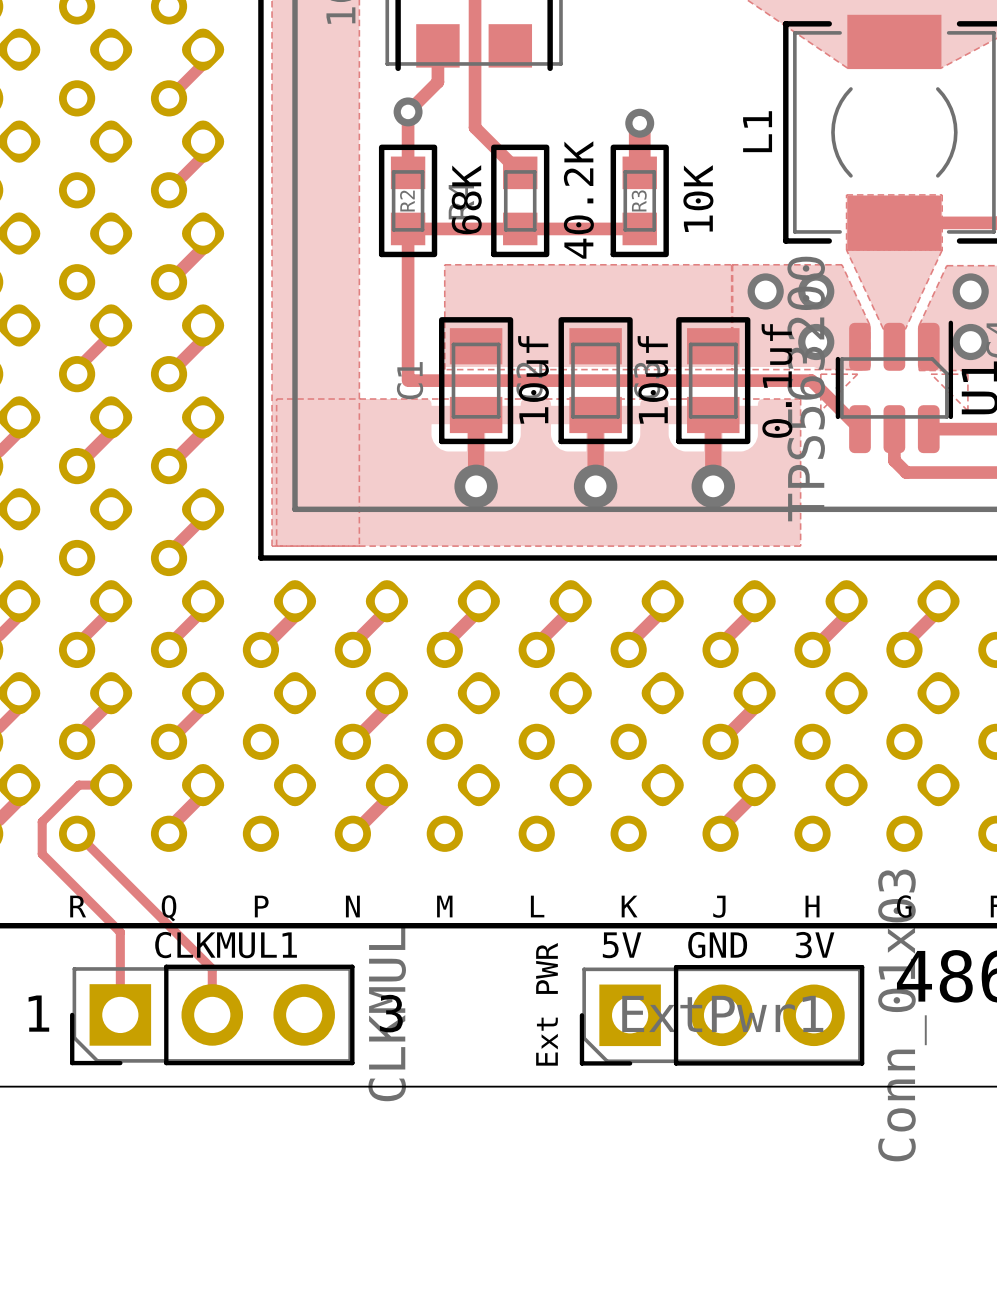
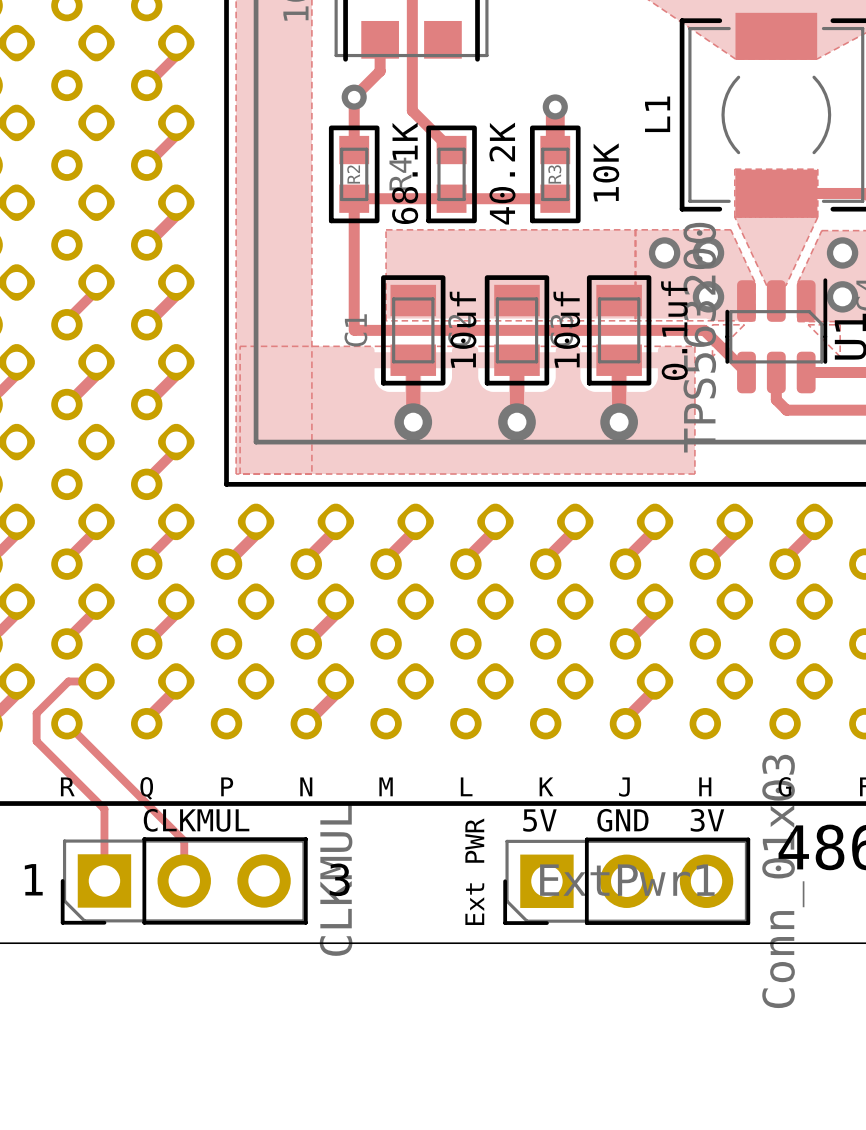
R2 value: 68K (466, 199) -> 68.1K (405, 173)
CLKMUL1 name: CLKMUL1 (226, 945) -> CLKMUL (196, 820)

